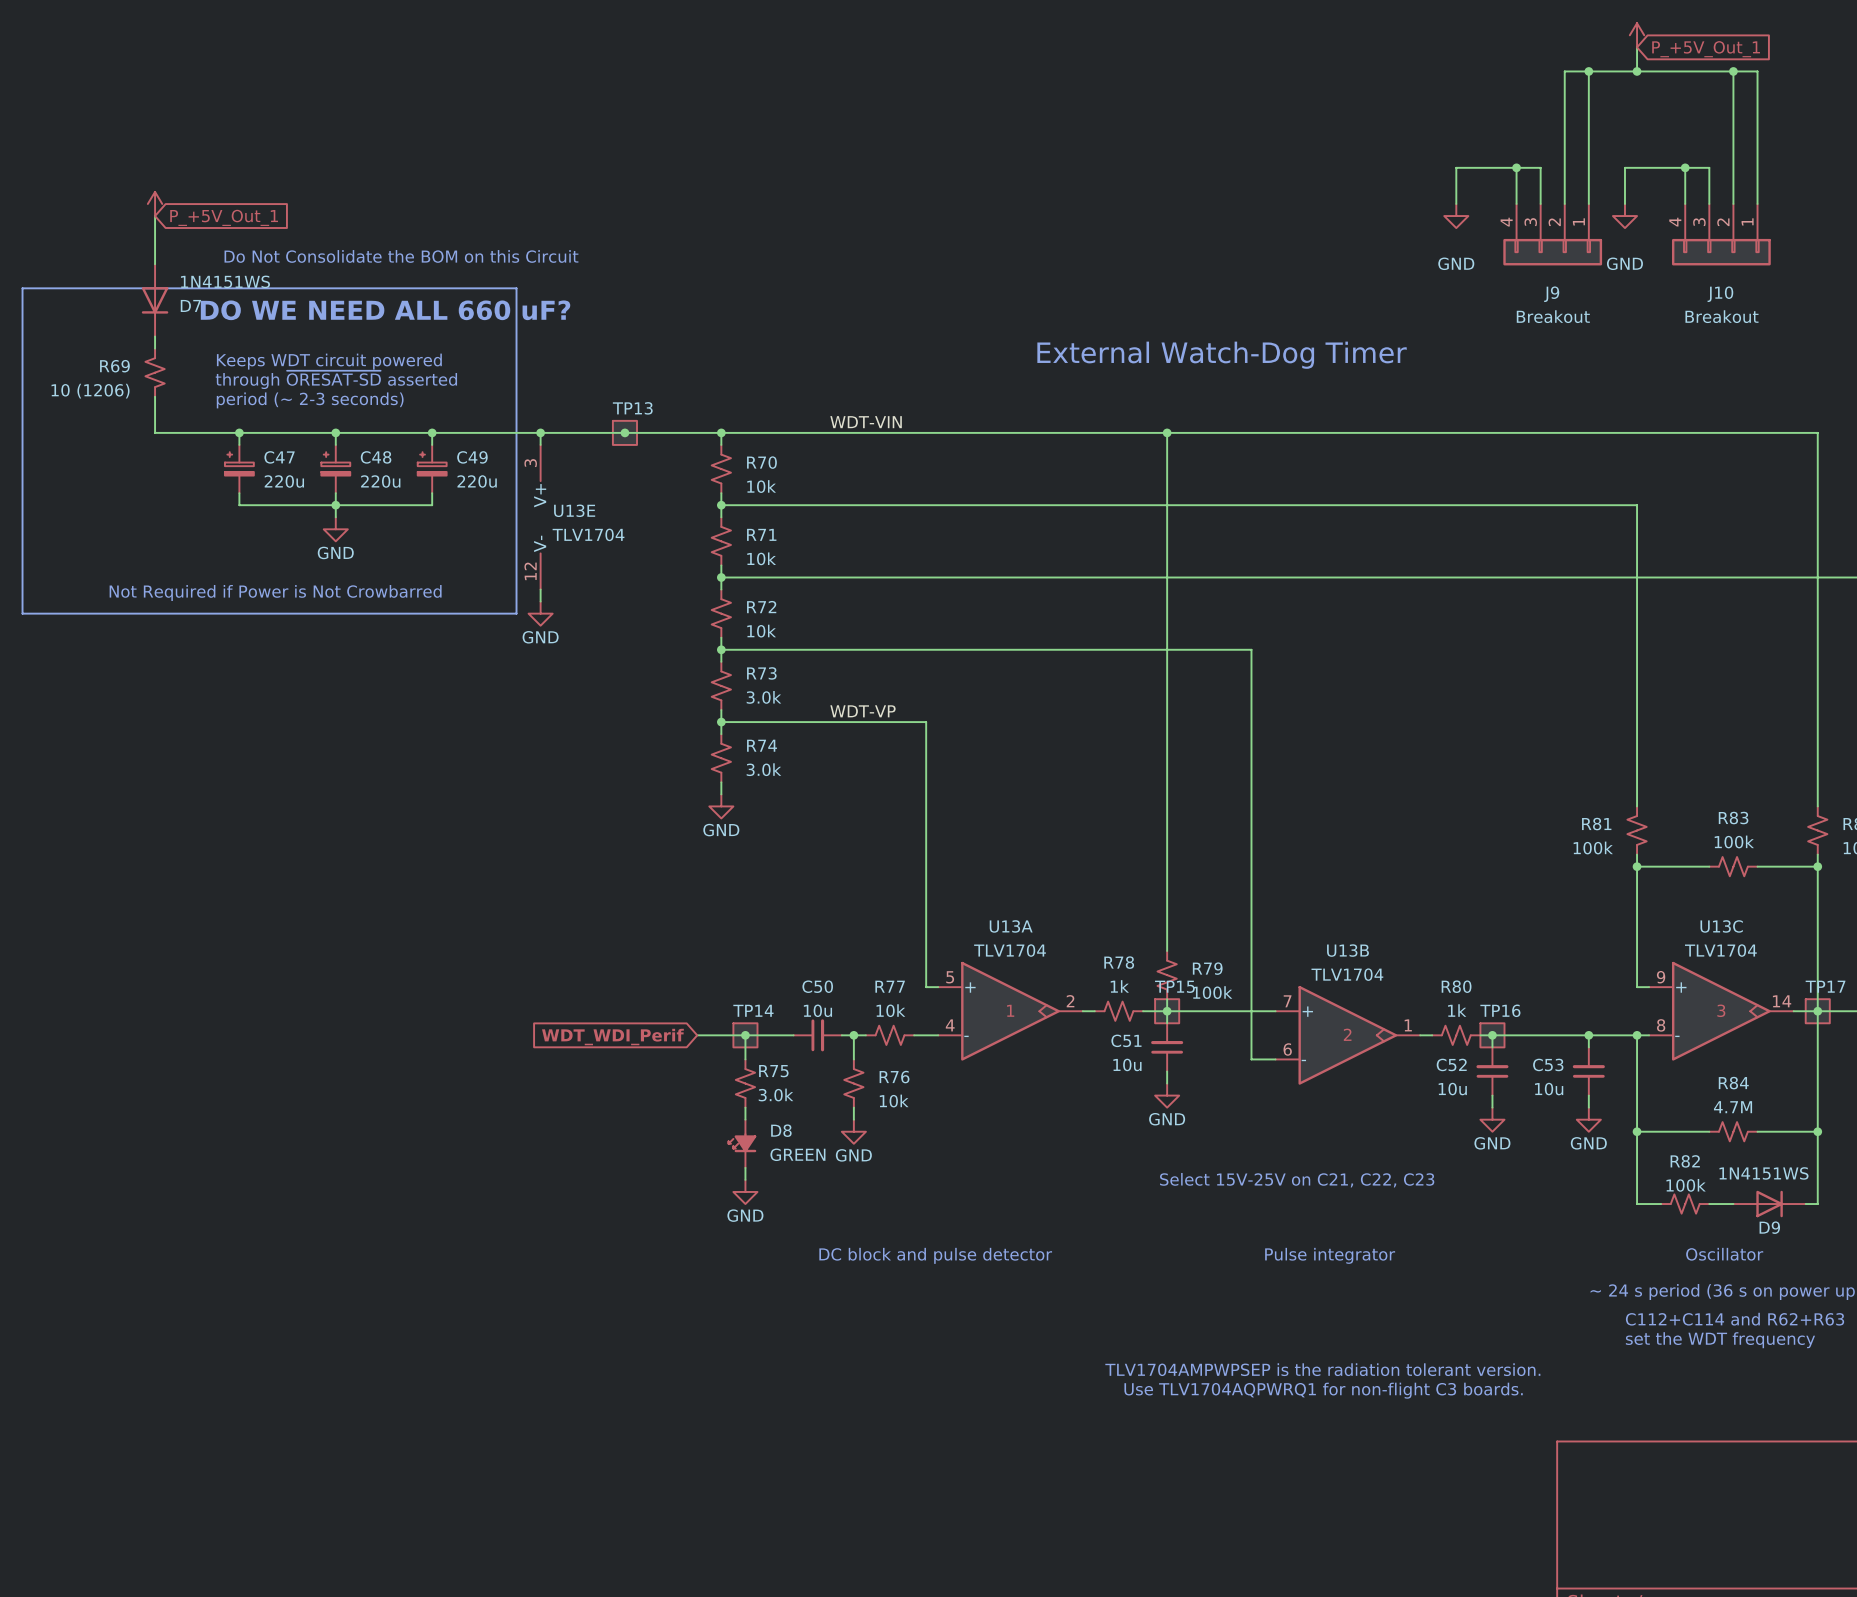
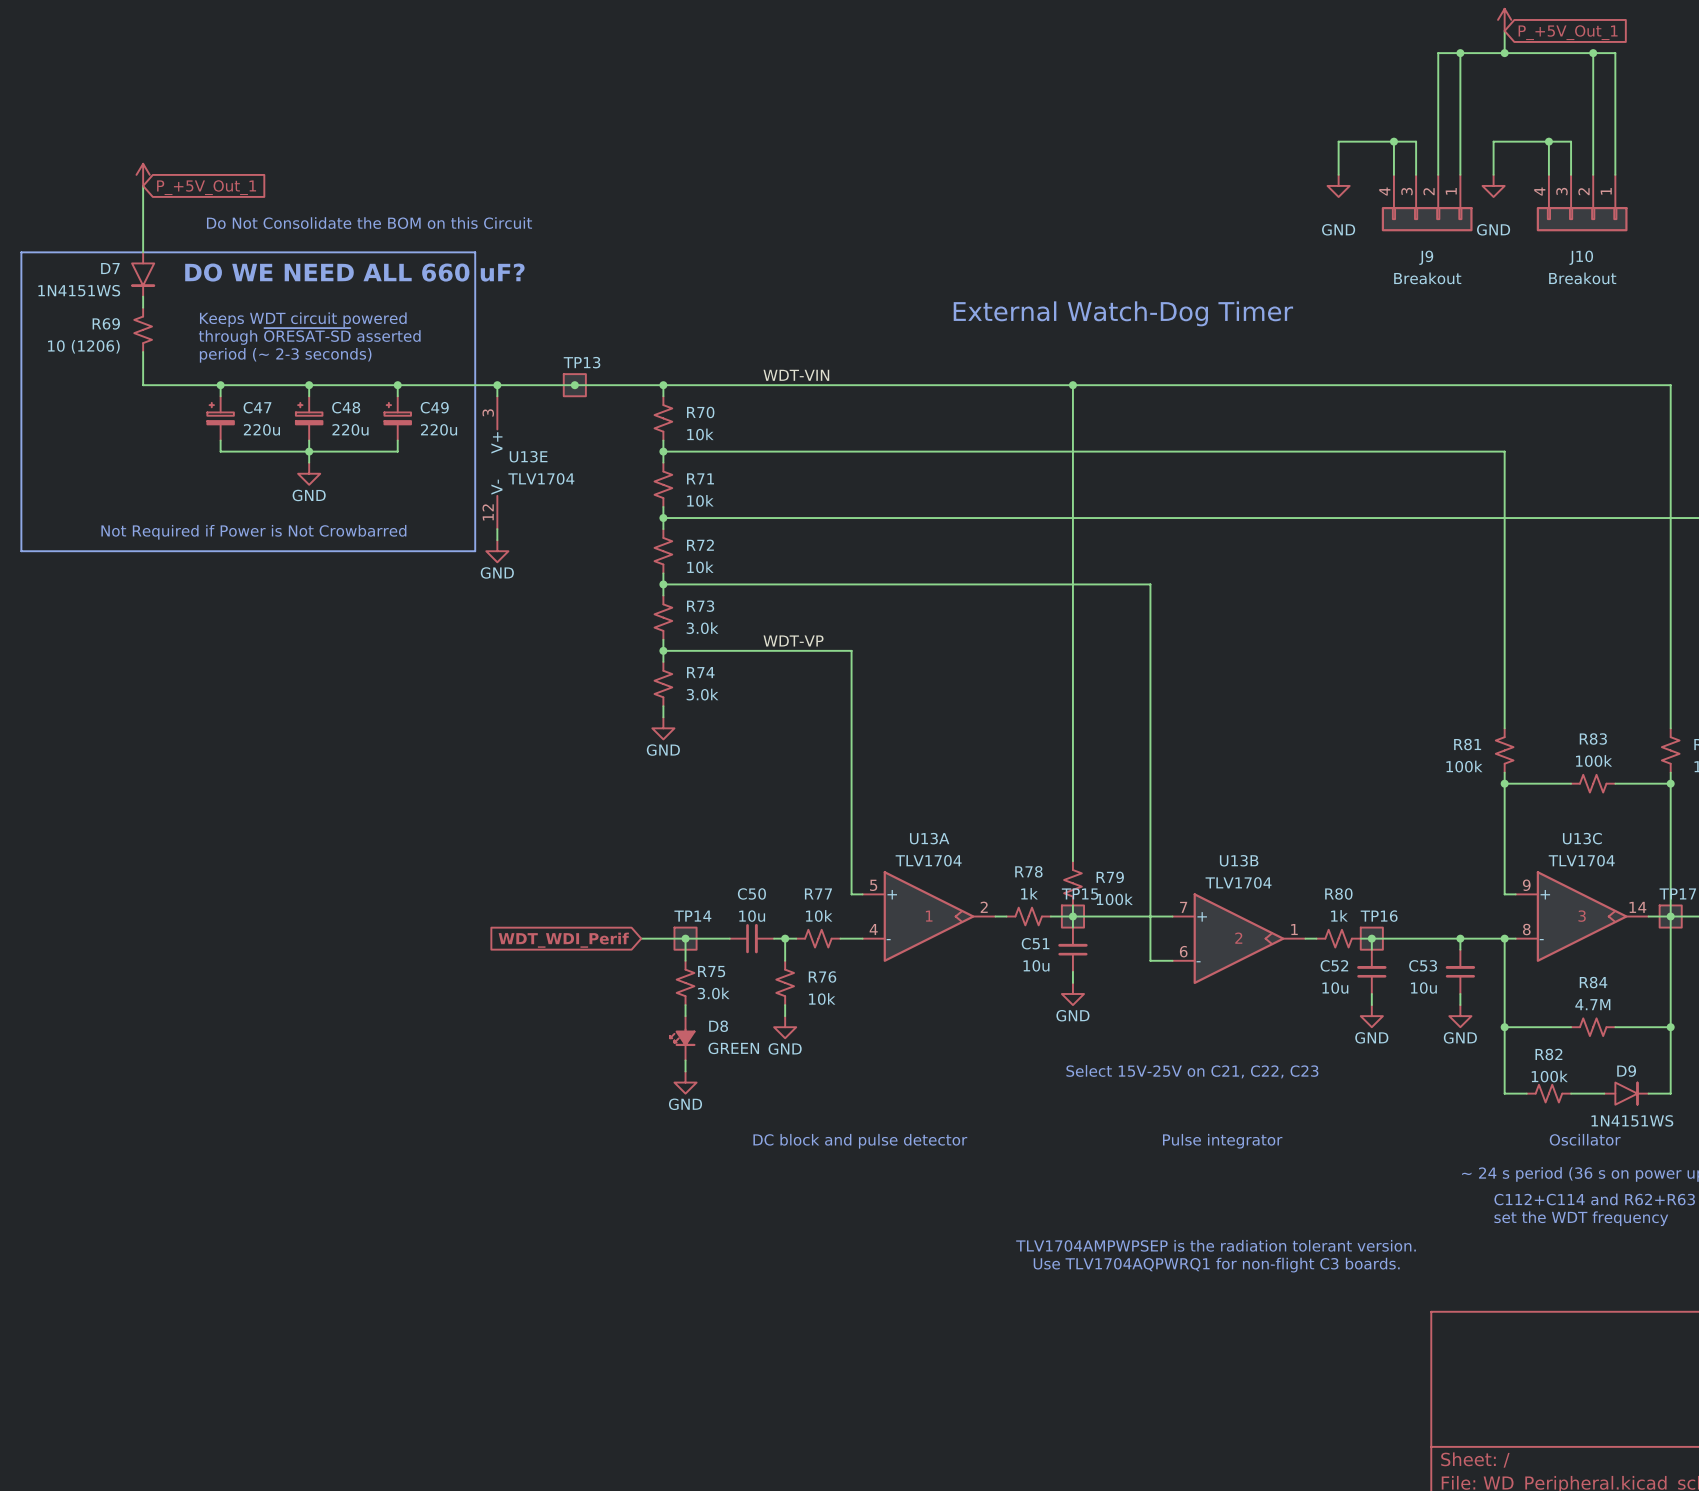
D7 symbol: [141, 264, 169, 337] -> [132, 252, 155, 297]
D7 value position: 1N4151WS (225, 281) -> 1N4151WS (79, 290)
D7 name position: D7 (190, 305) -> D7 (110, 268)
D9 value position: 1N4151WS (1763, 1173) -> 1N4151WS (1632, 1120)
D9 symbol: [1733, 1190, 1806, 1218] -> [1604, 1082, 1649, 1105]
D9 name position: D9 (1769, 1227) -> D9 (1626, 1071)

